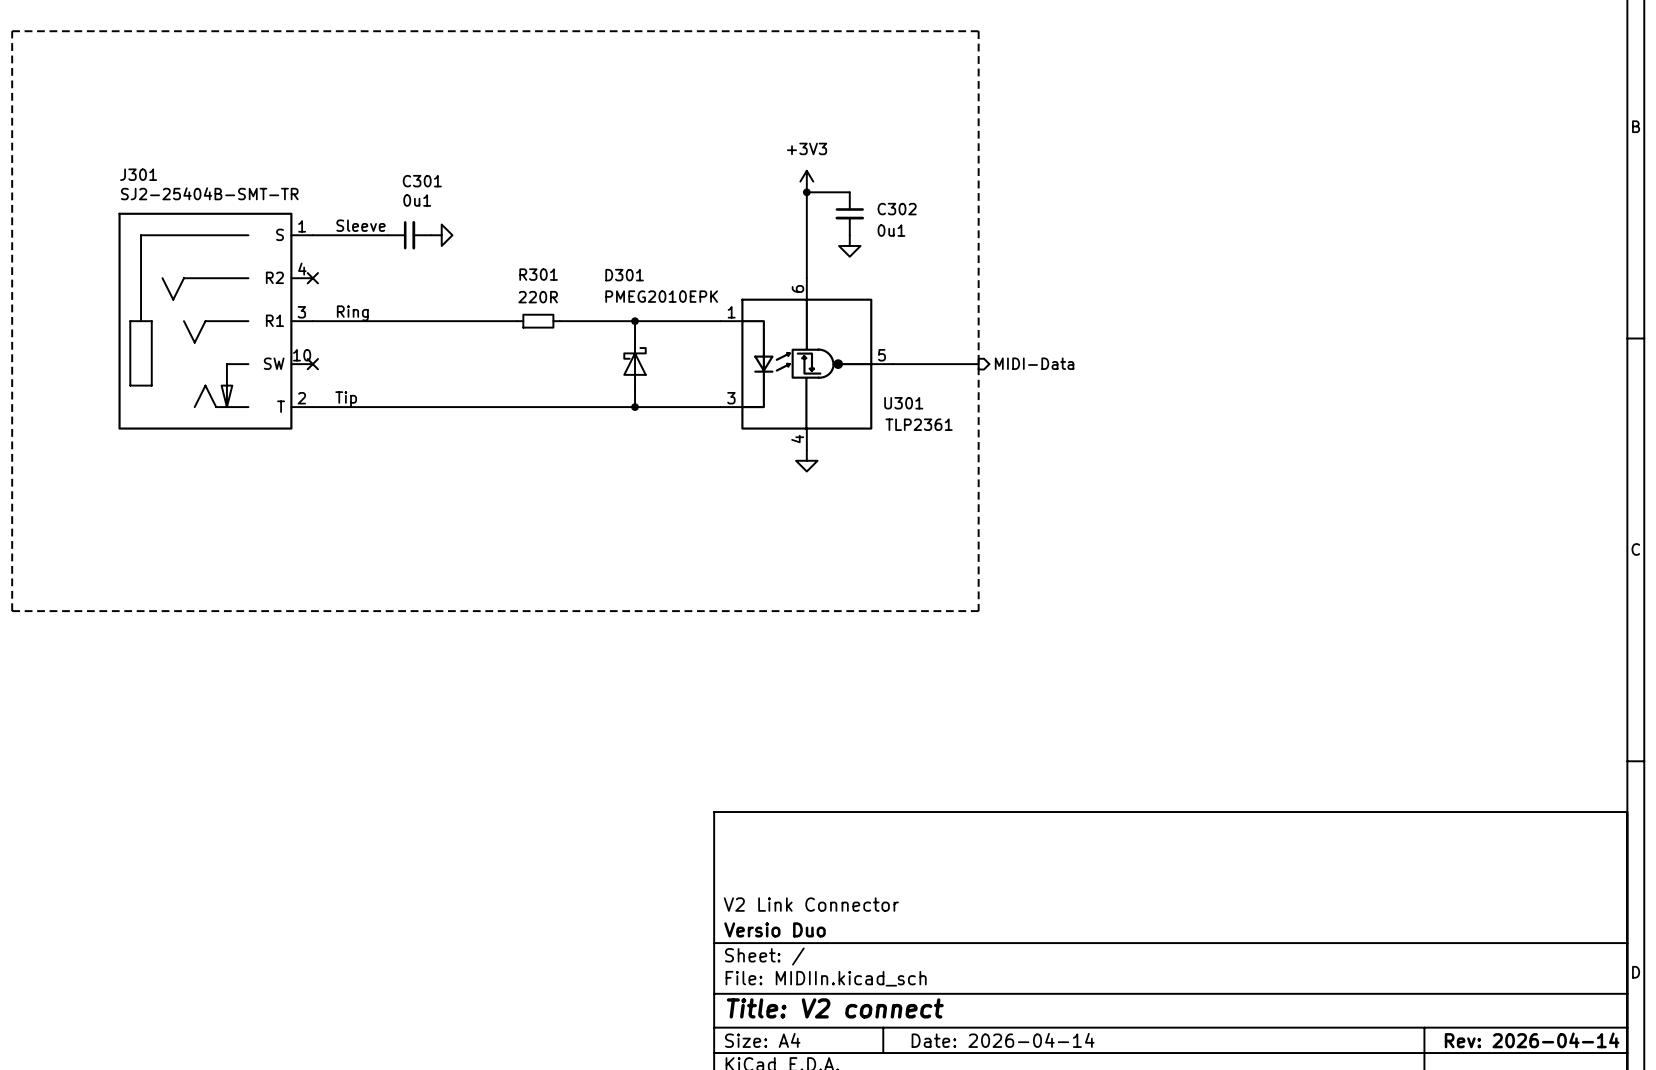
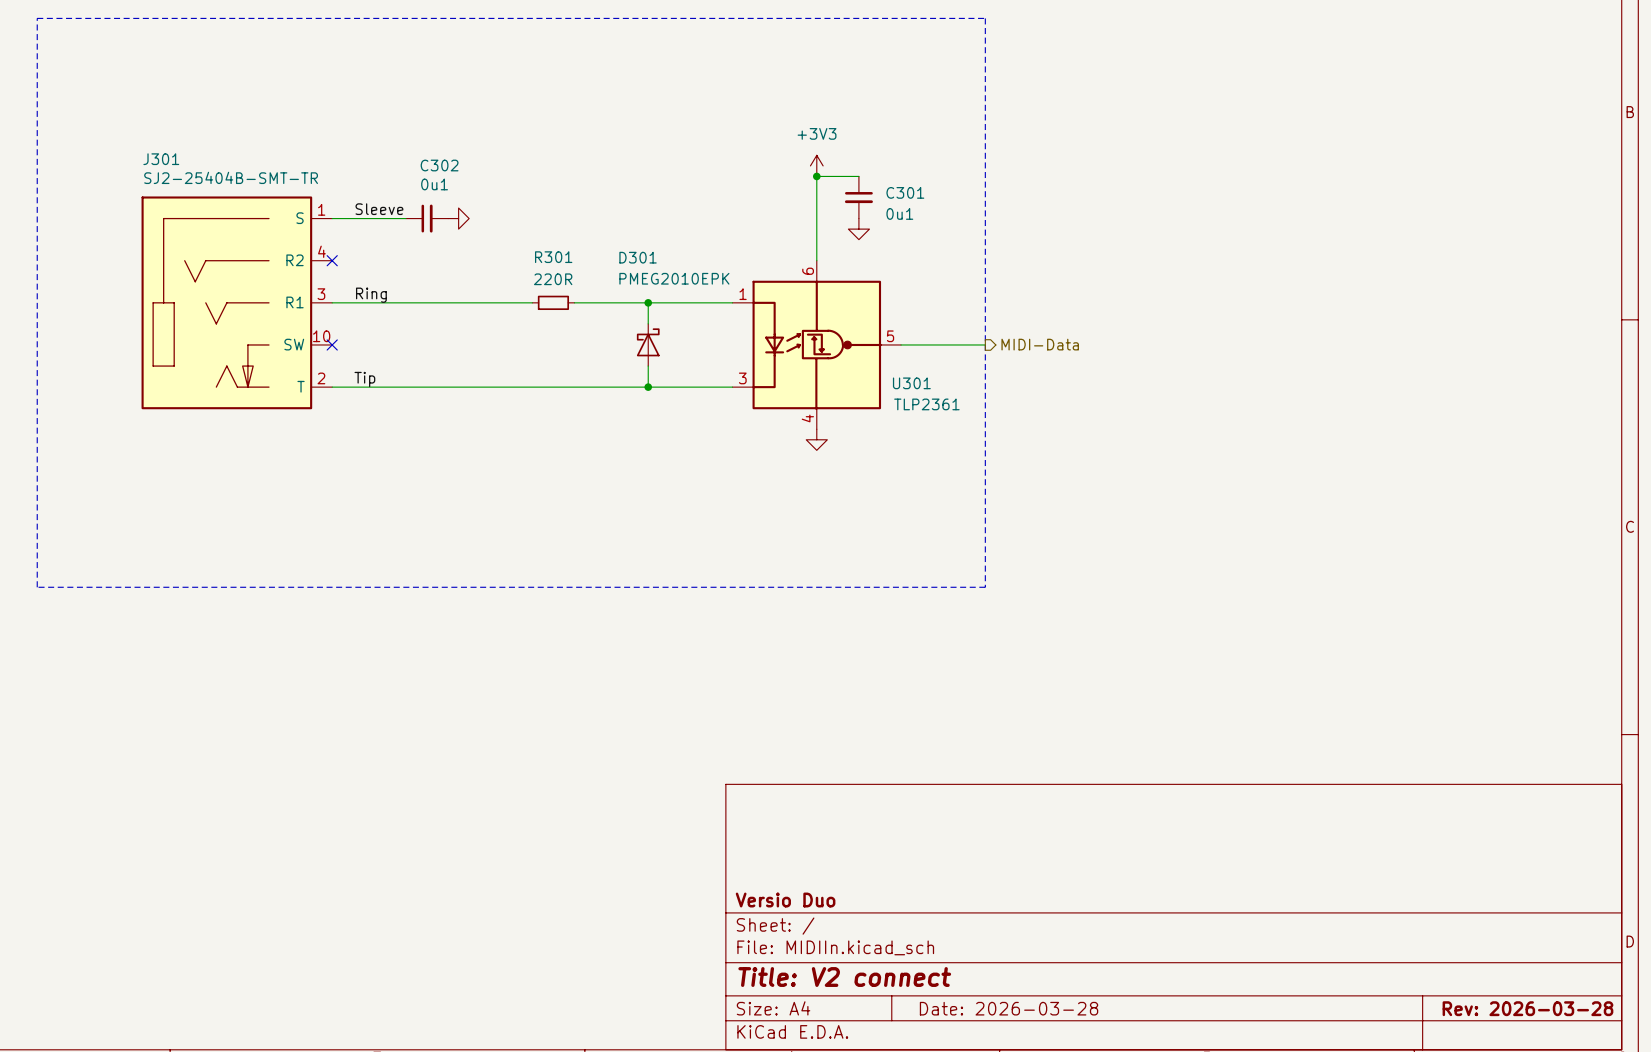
C301 name: C301 (422, 181) -> C302 (439, 165)
C302 name: C302 (897, 209) -> C301 (905, 192)
title block: V2 Link Connector (811, 904) -> none
title block: Date: 2026-04-14 (1003, 1040) -> Date: 2026-03-28 (1009, 1008)
title block: Rev: 2026-04-14 (1532, 1040) -> Rev: 2026-03-28 (1527, 1008)

